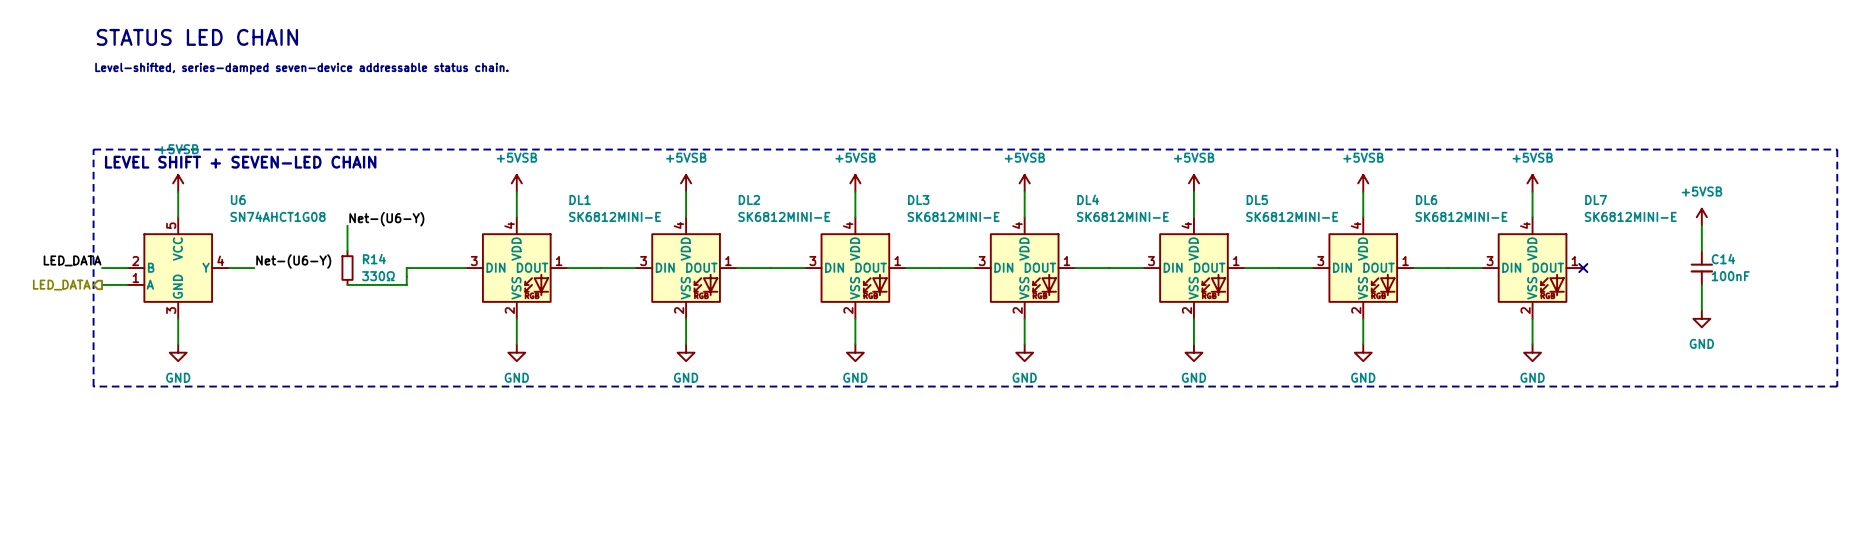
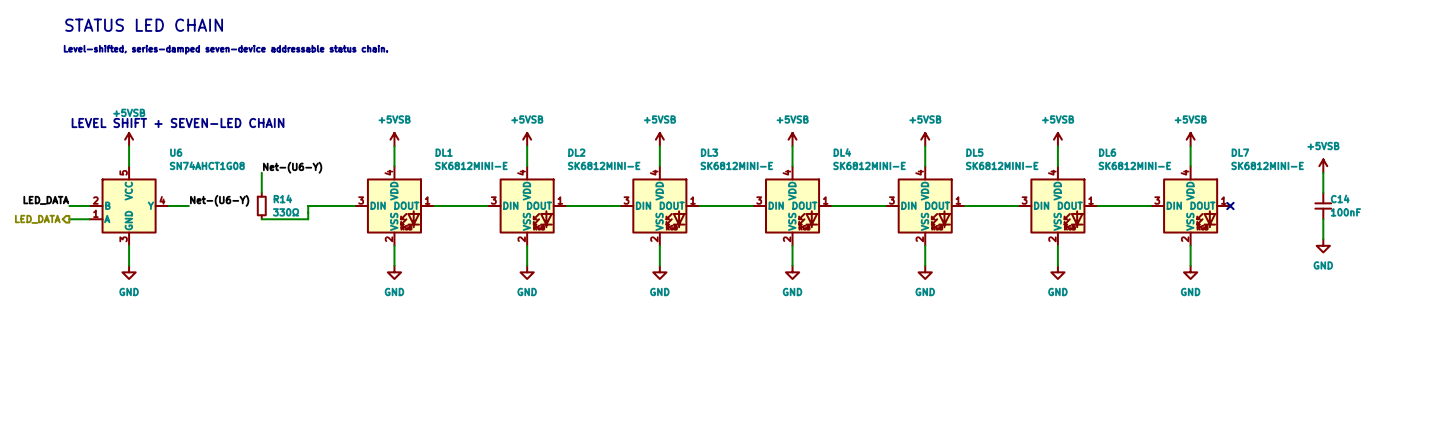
line: (93, 149) (1837, 149) (1837, 386) (93, 386) (93, 149) -> none

